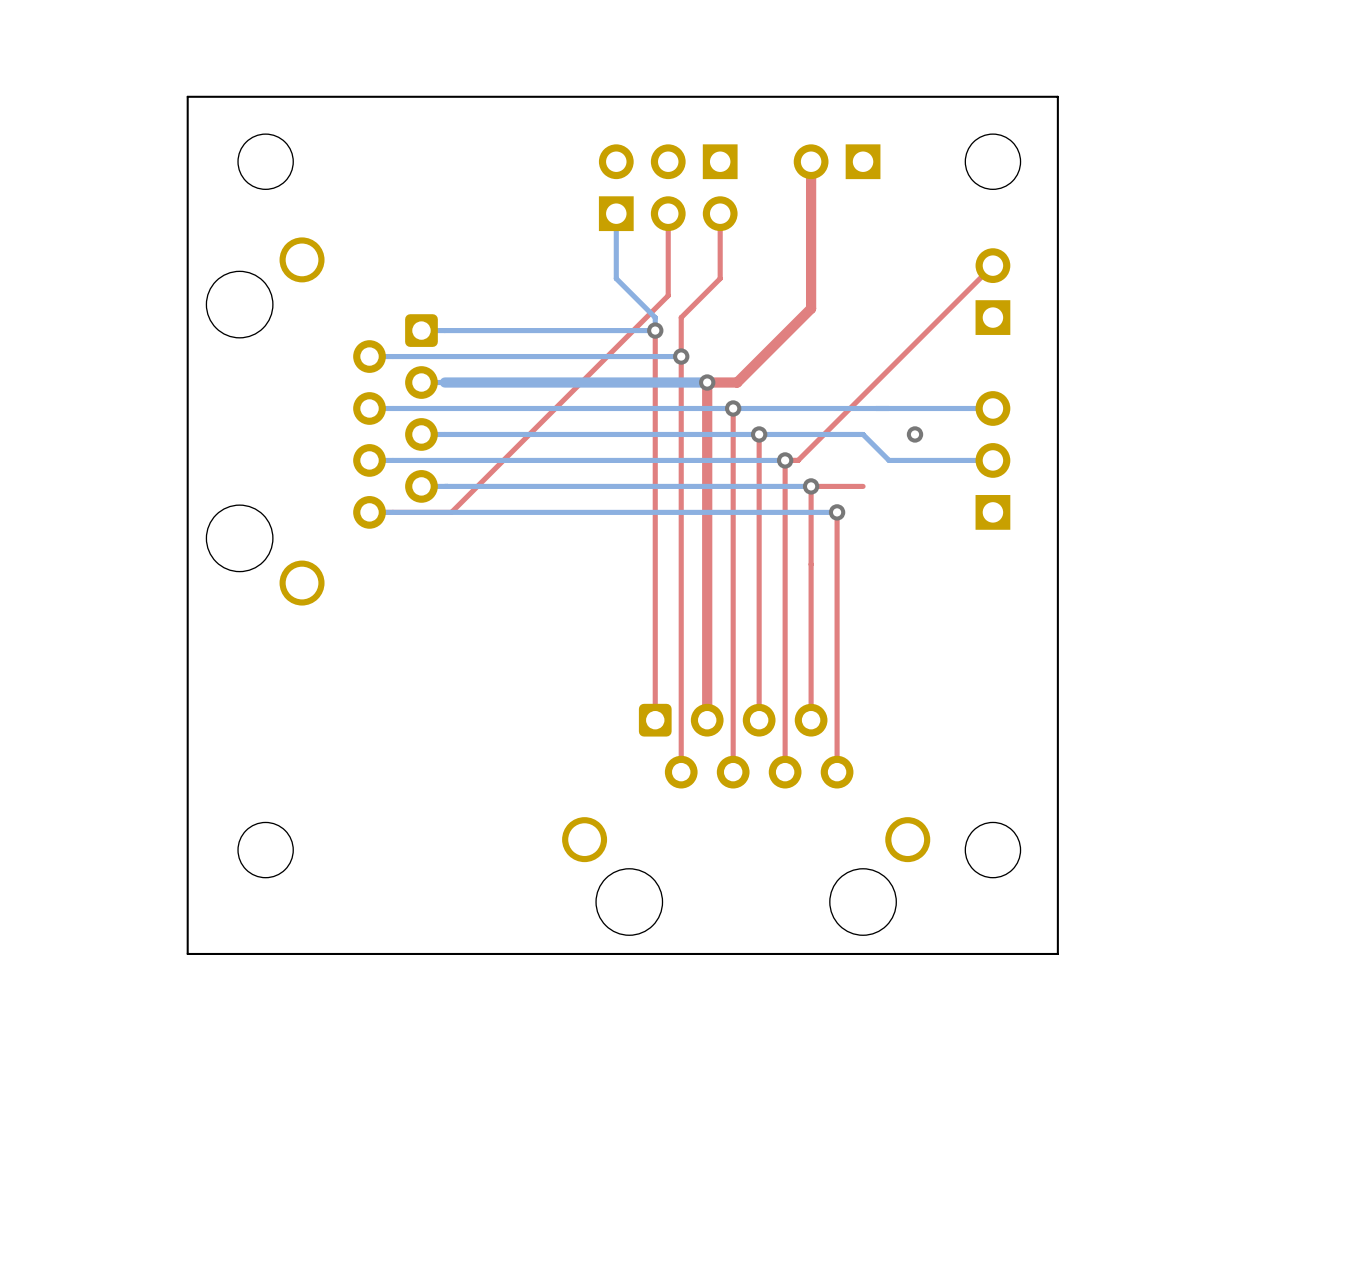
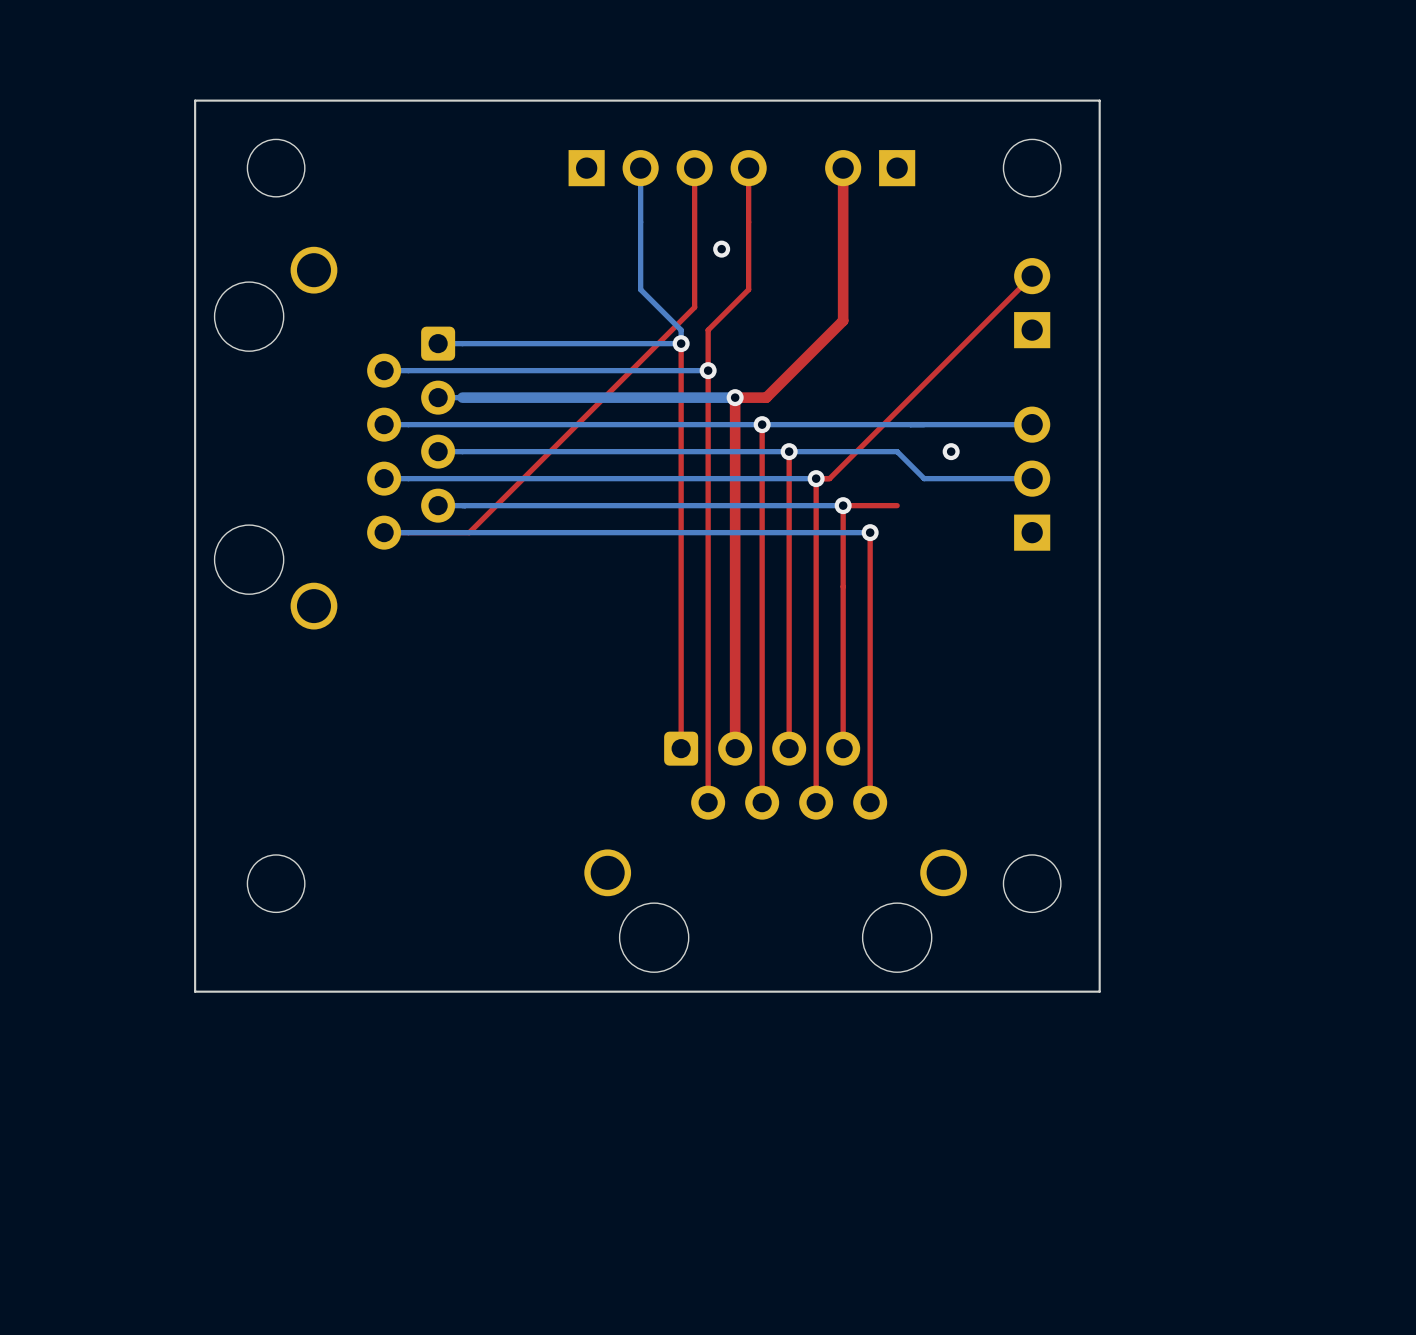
bottom track: none -> (640, 168) (640, 222)
part: none -> (667, 168)
top track: none -> (694, 168) (694, 222)
part: (668, 161) -> none
top track: none -> (748, 168) (748, 222)
part: (668, 213) -> none
via: none -> (721, 249)

